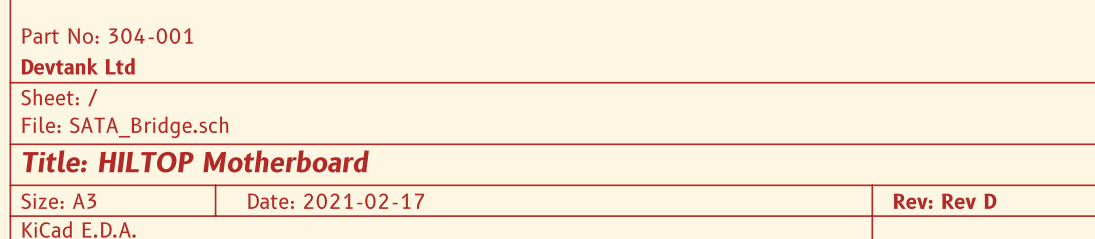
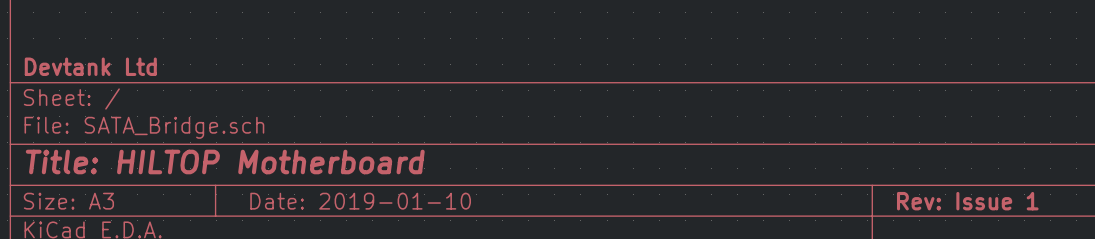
title block: Part No: 304-001 (107, 36) -> none
title block: Date: 2021-02-17 (336, 201) -> Date: 2019-01-10 (360, 201)
title block: Rev: Rev D (945, 201) -> Rev: Issue 1 (967, 201)

